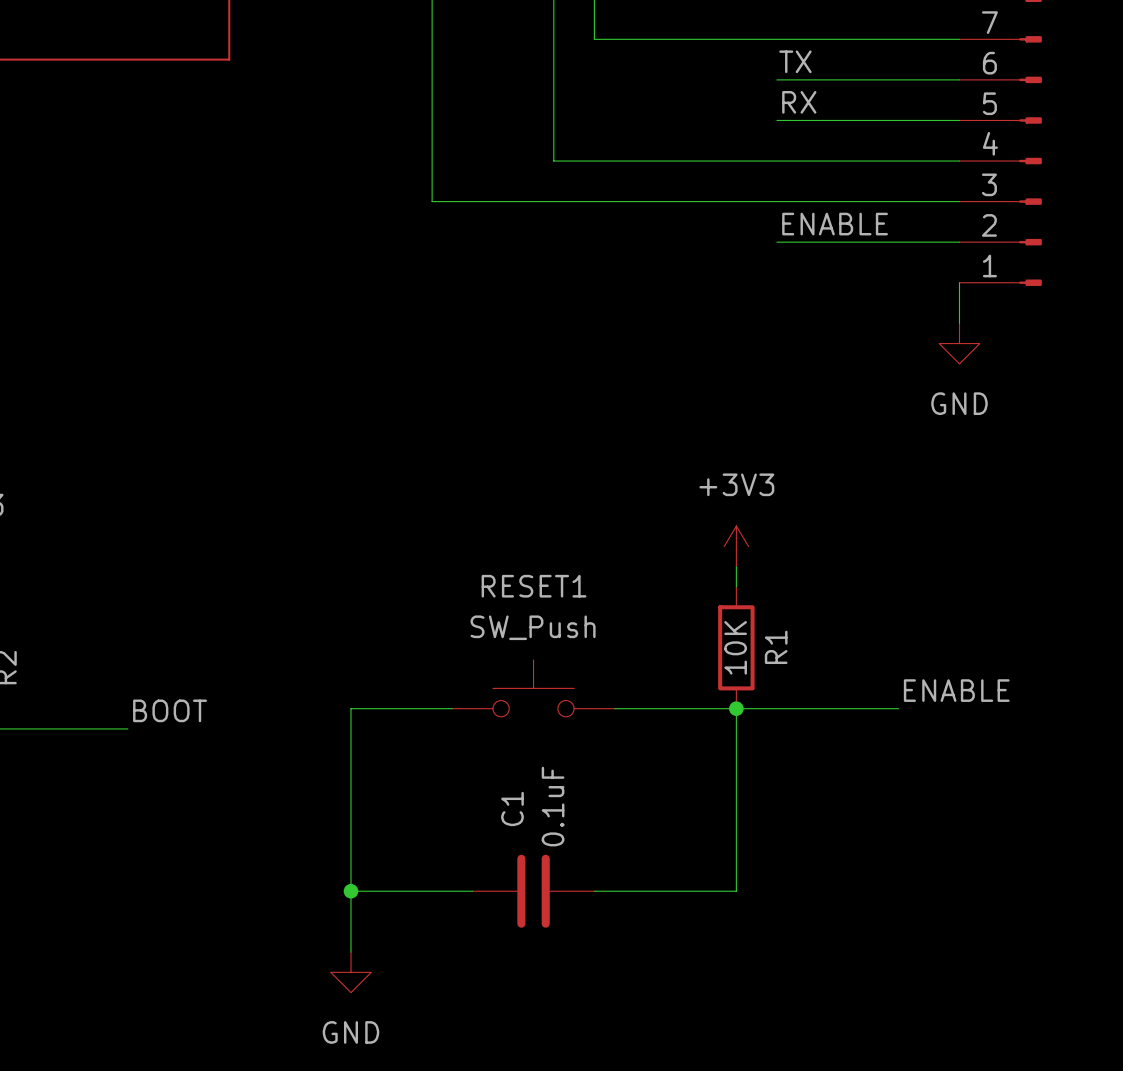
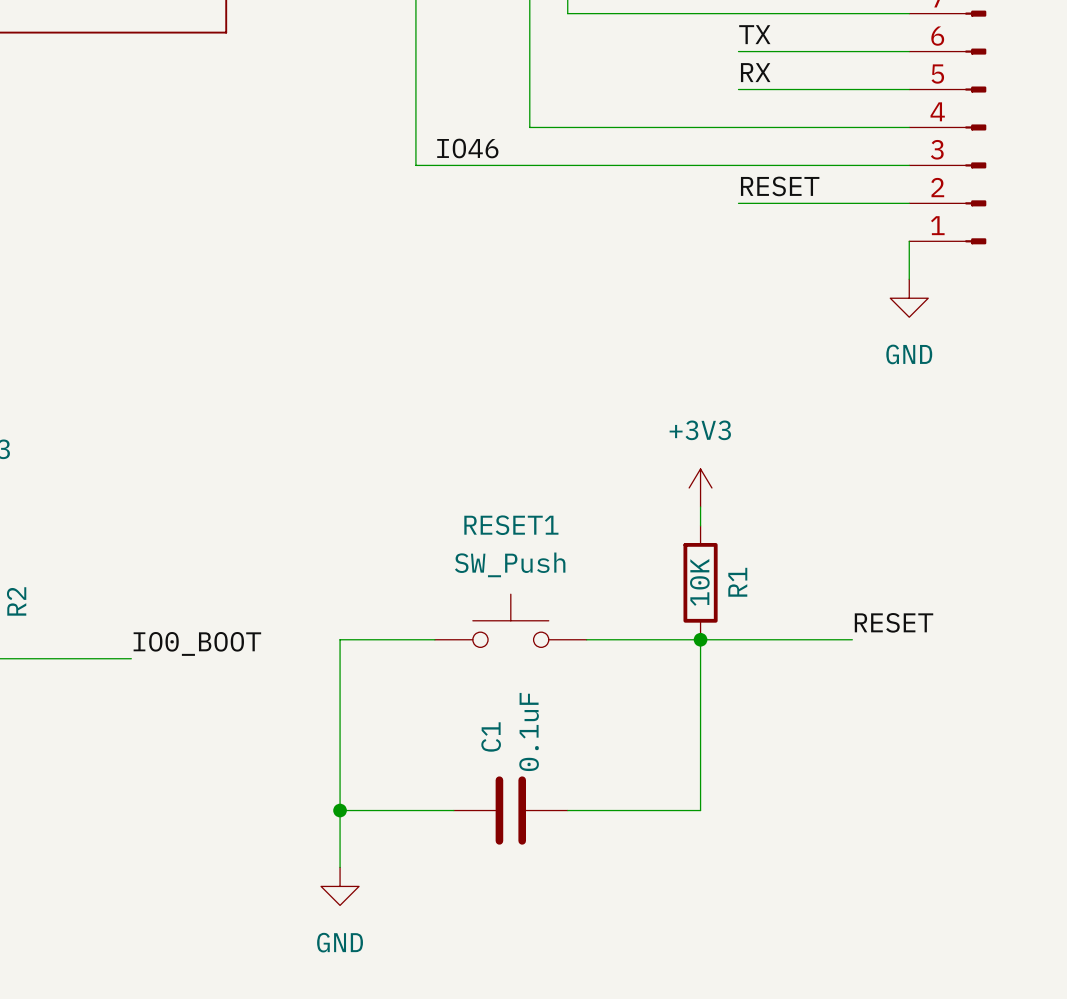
label: none -> IO46 (467, 148)
label: ENABLE (835, 224) -> RESET (780, 186)
label: ENABLE (956, 690) -> RESET (894, 622)
label: BOOT (170, 710) -> IO0_BOOT (197, 643)

